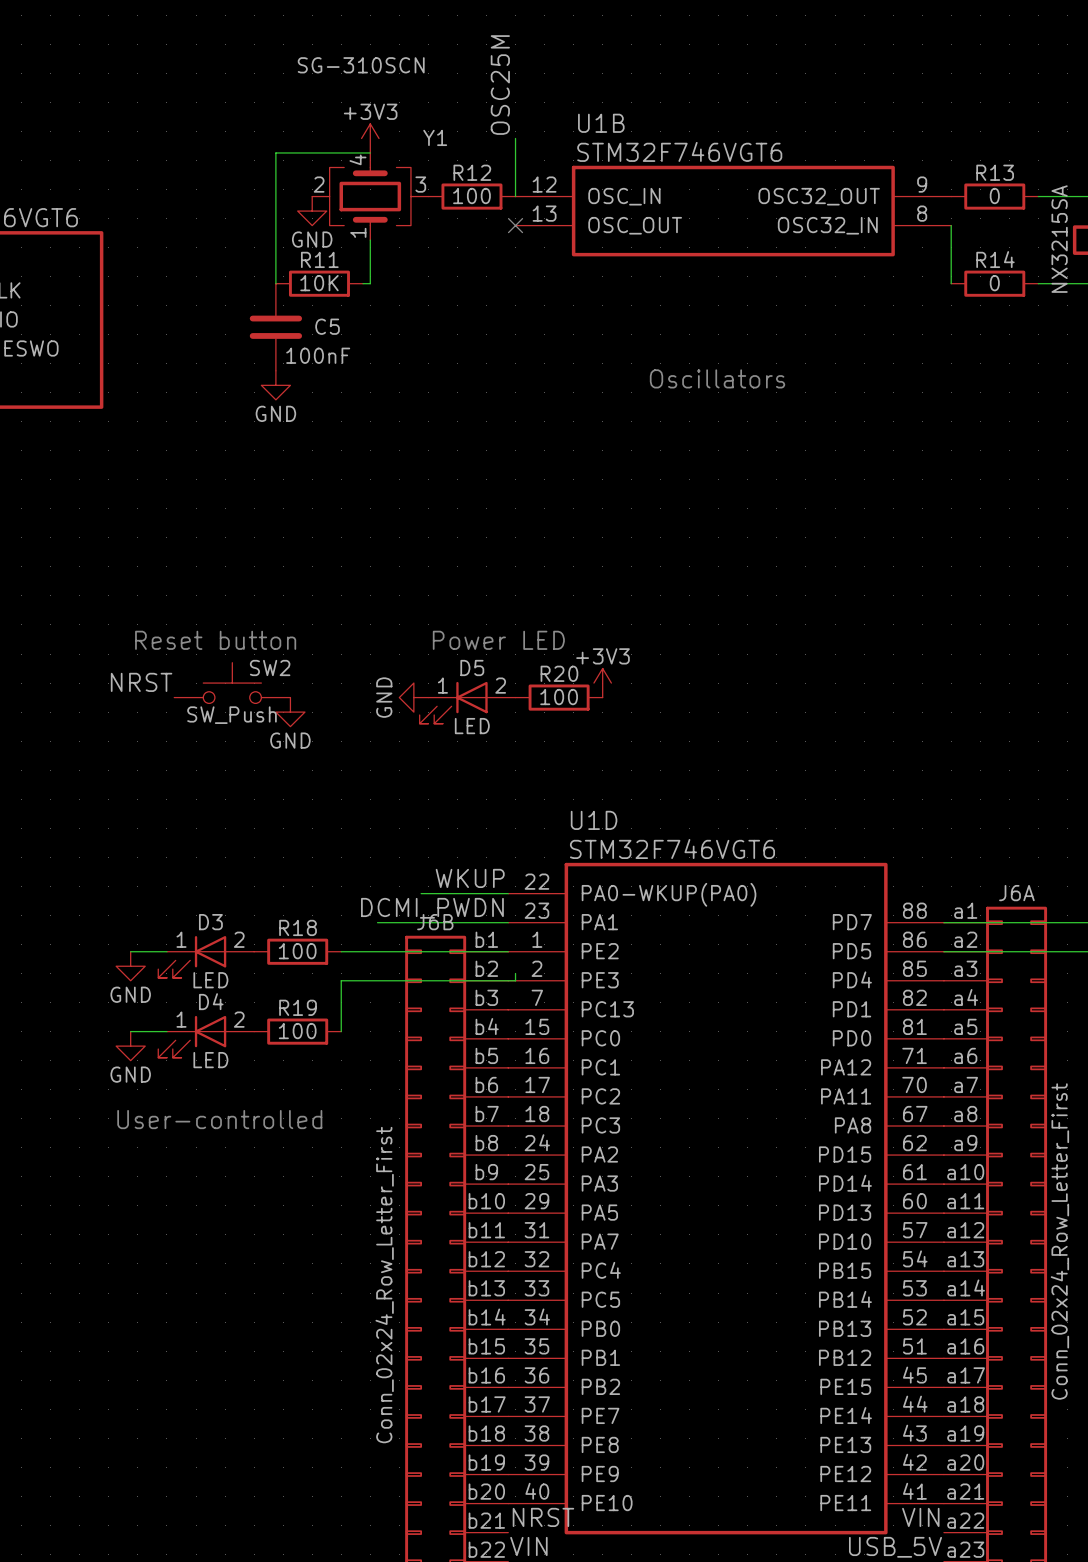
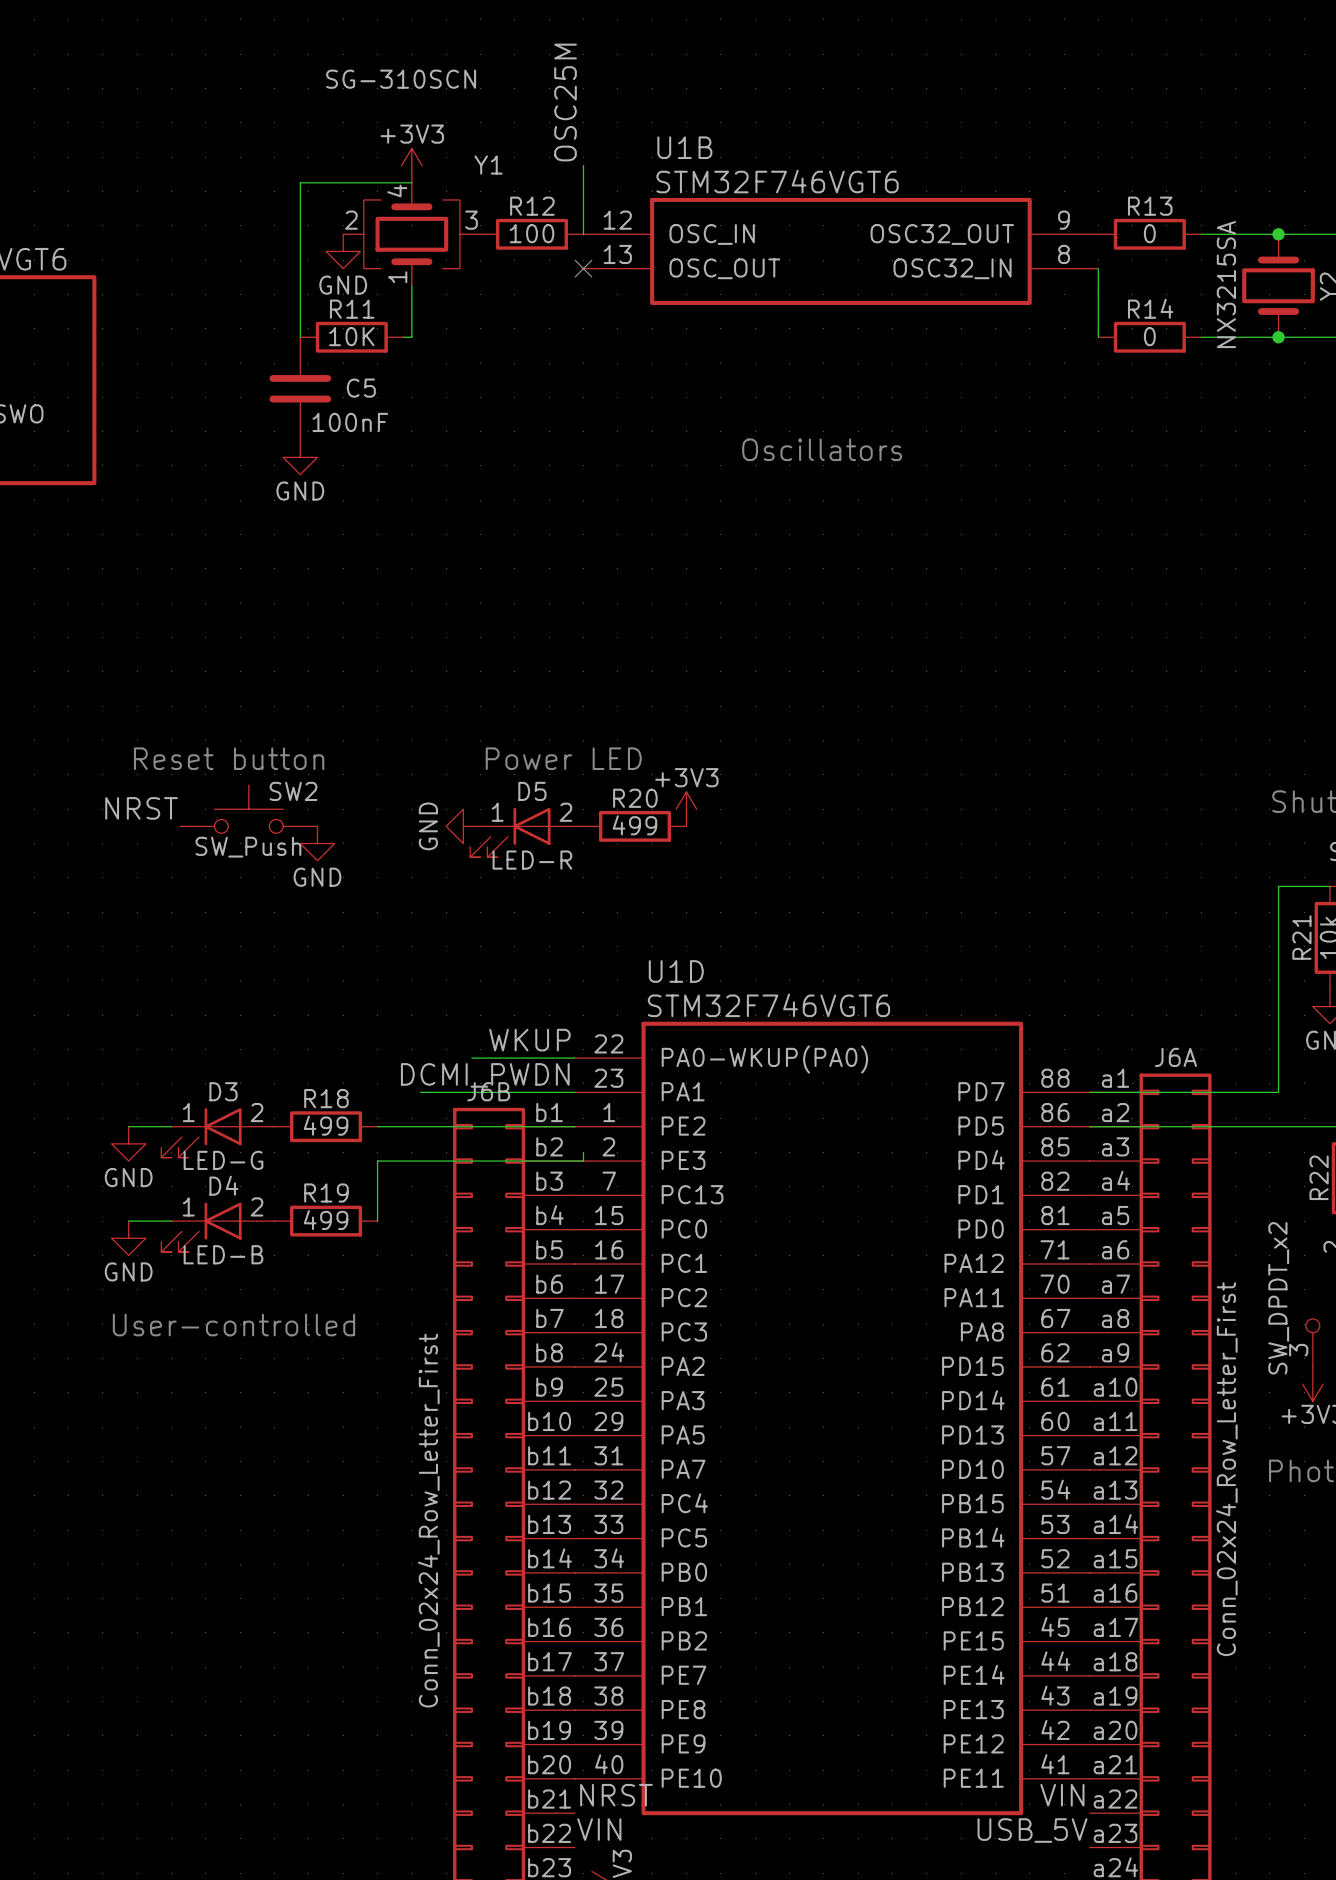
R20 value: 100 (559, 697) -> 499 (634, 825)
D5 value: LED (472, 726) -> LED-R (532, 860)
R18 value: 100 (297, 951) -> 499 (326, 1125)
D3 value: LED (210, 980) -> LED-G (223, 1160)
R19 value: 100 (297, 1031) -> 499 (326, 1220)
D4 value: LED (210, 1060) -> LED-B (223, 1254)

